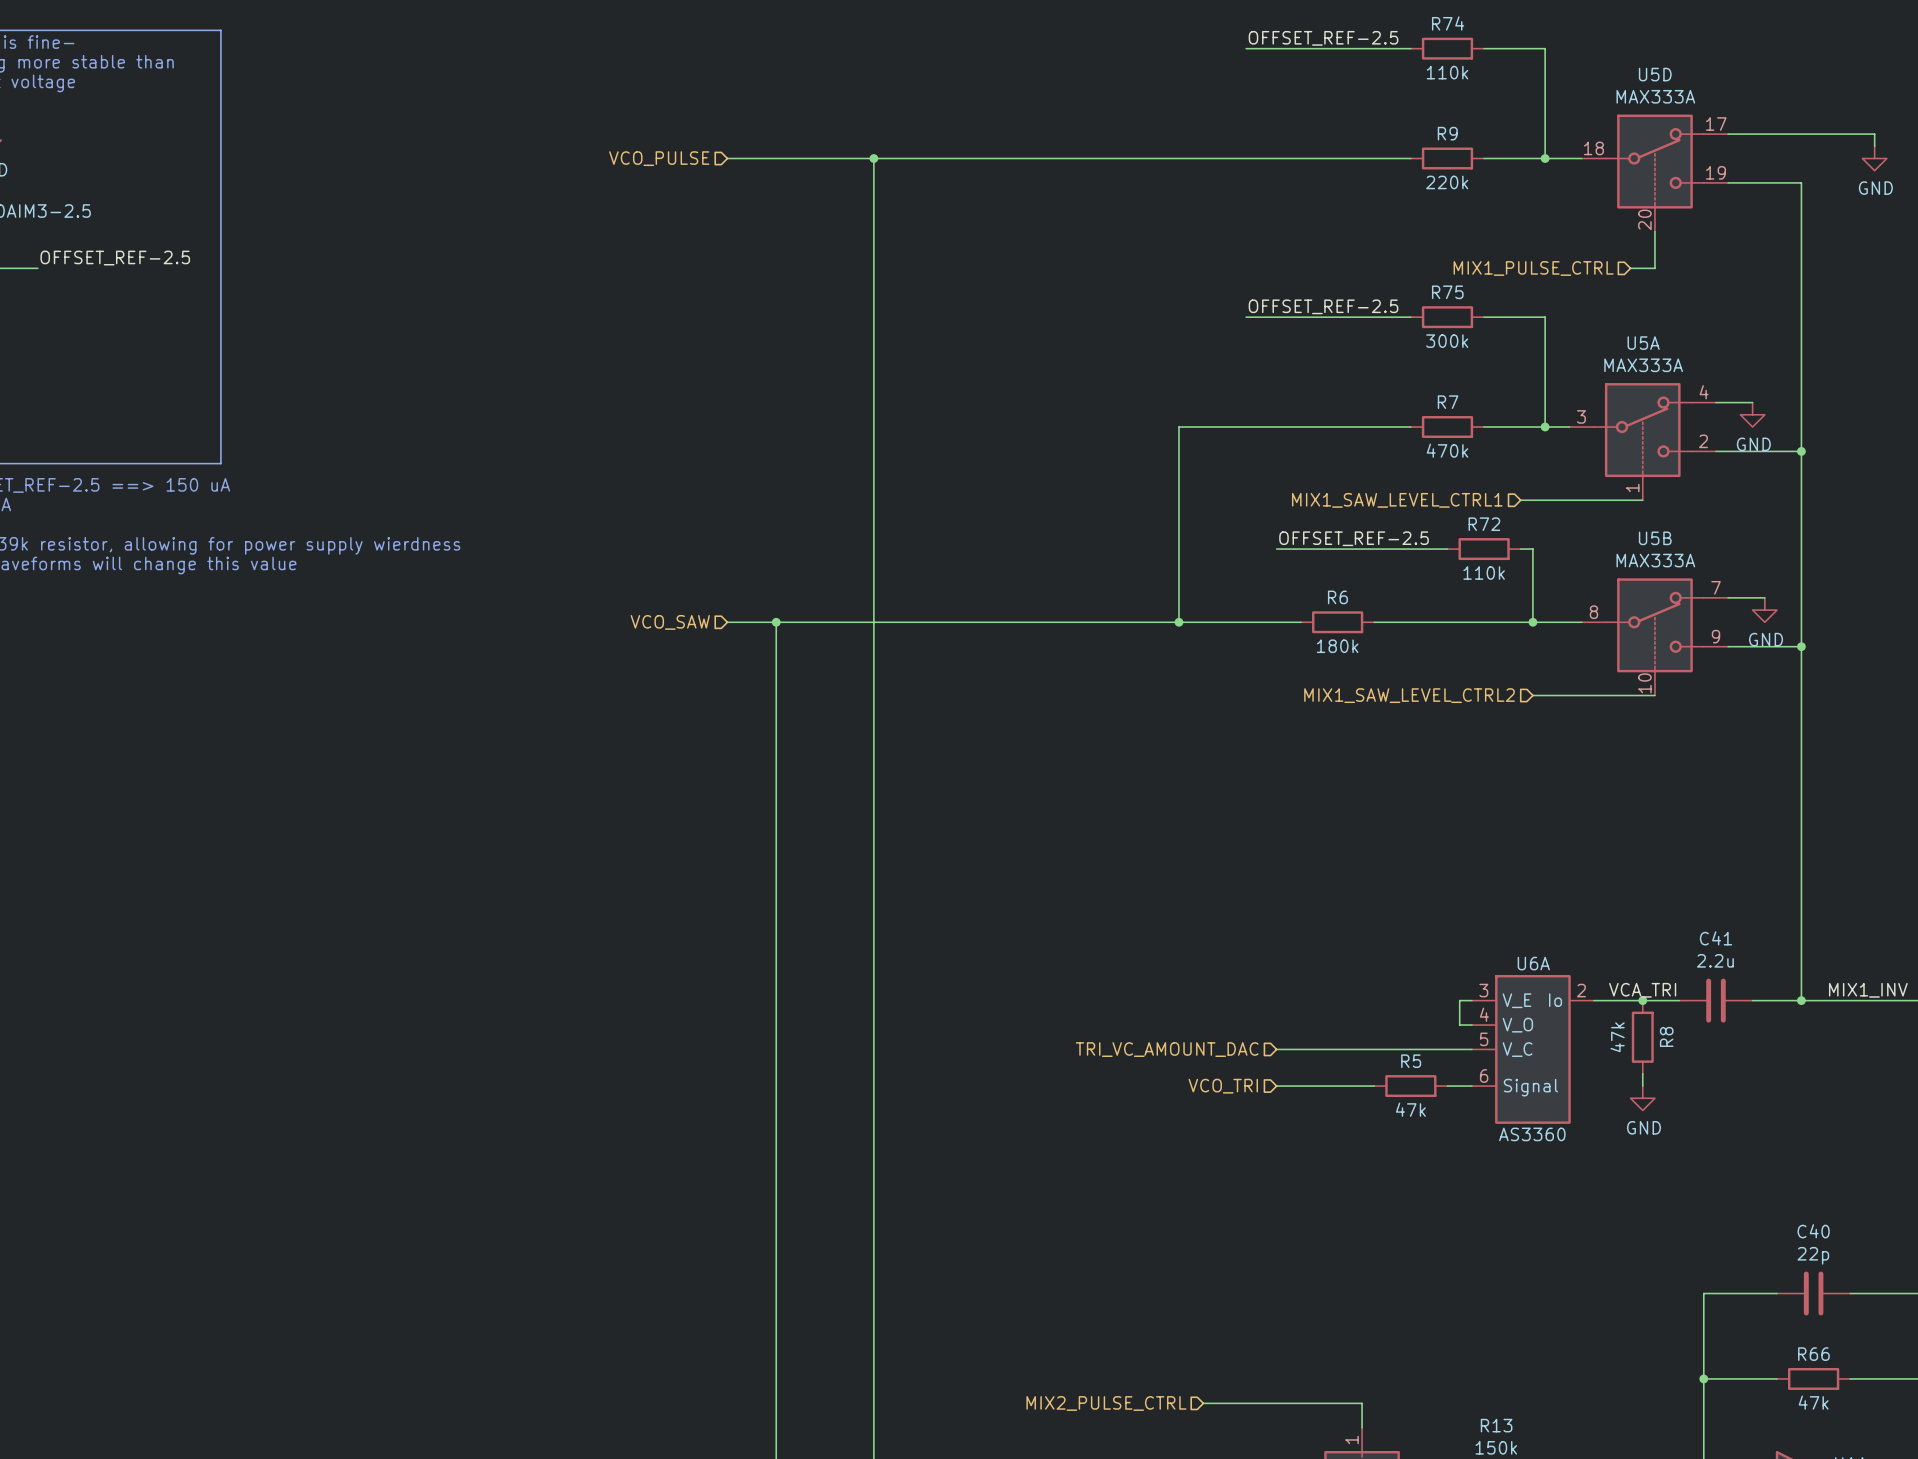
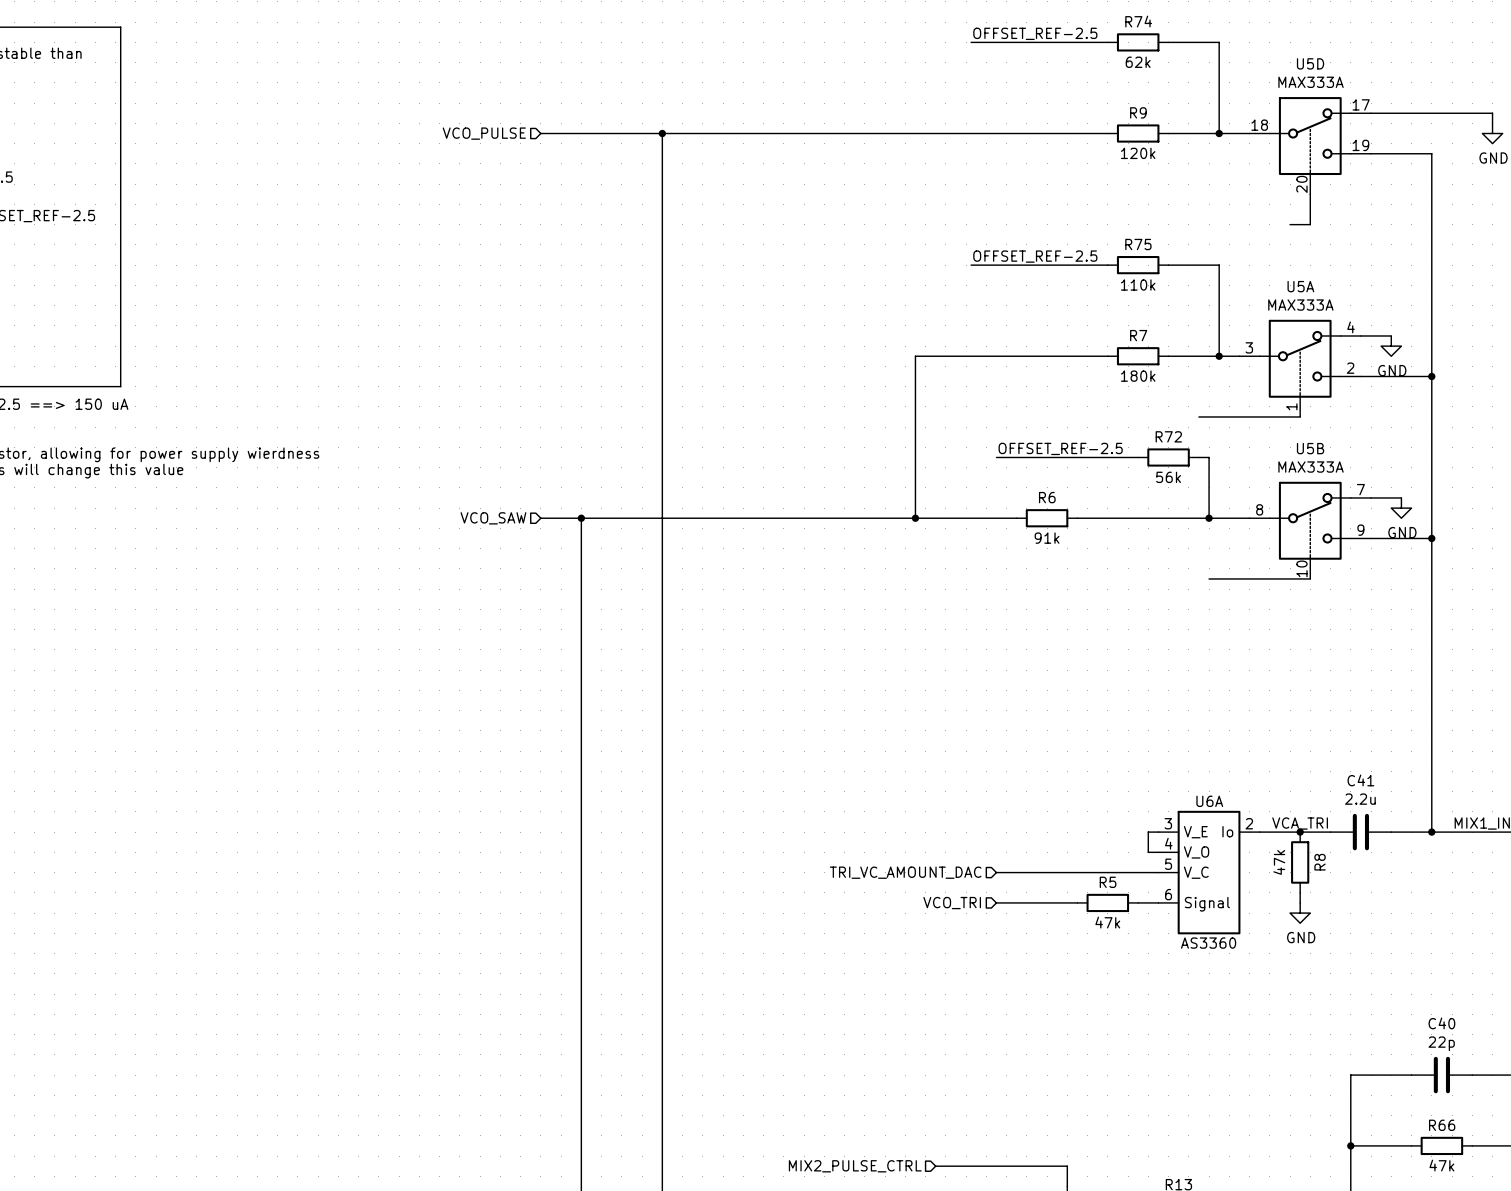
R74 value: 110k (1447, 72) -> 62k (1138, 62)
R9 value: 220k (1447, 182) -> 120k (1138, 153)
hierarchical label: MIX1_PULSE_CTRL (1533, 268) -> none
R75 value: 300k (1447, 341) -> 110k (1138, 284)
R7 value: 470k (1447, 450) -> 180k (1138, 376)
hierarchical label: MIX1_SAW_LEVEL_CTRL1 (1397, 500) -> none
R72 value: 110k (1484, 573) -> 56k (1168, 477)
R6 value: 180k (1337, 646) -> 91k (1047, 538)
hierarchical label: MIX1_SAW_LEVEL_CTRL2 (1409, 695) -> none

